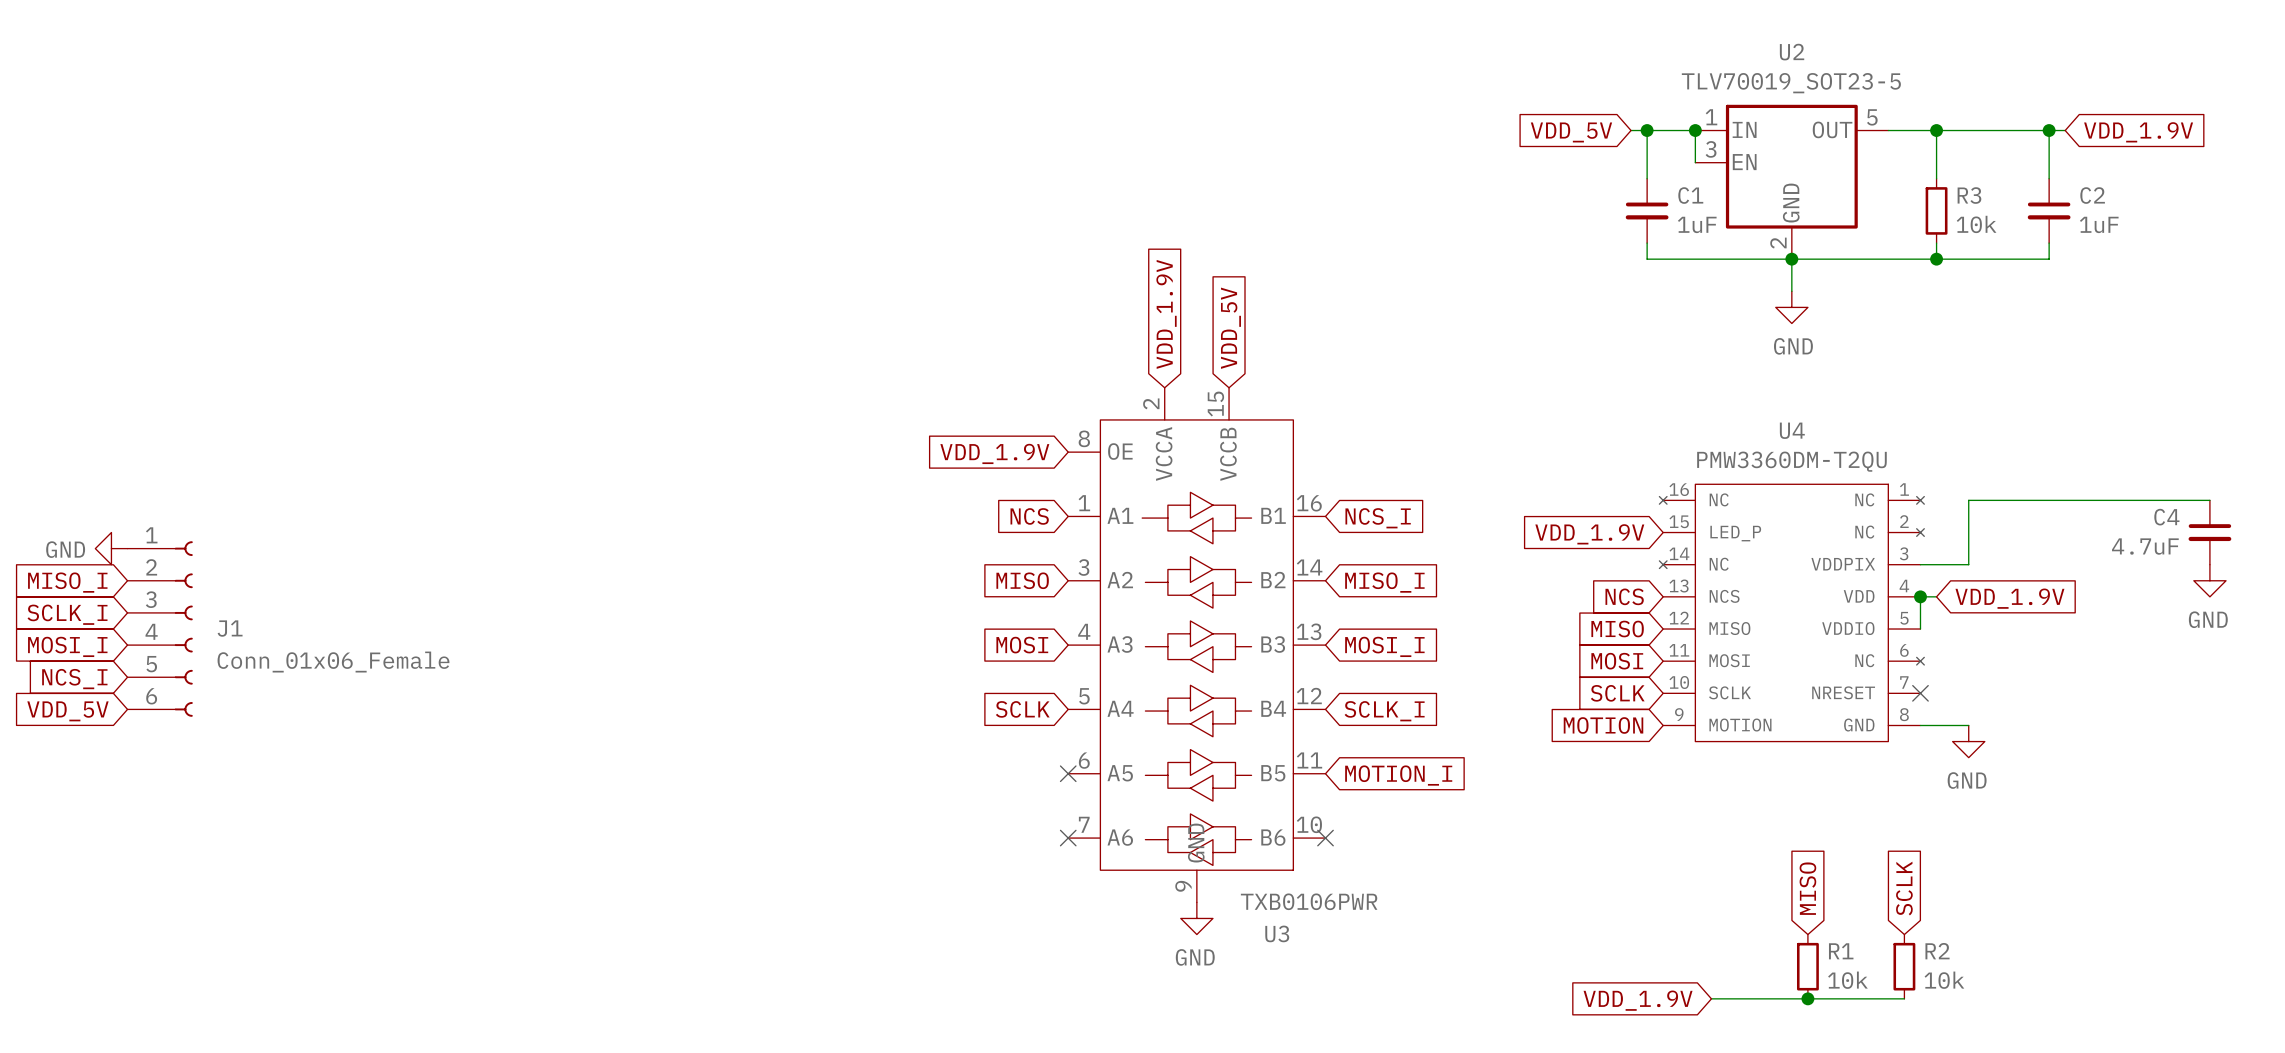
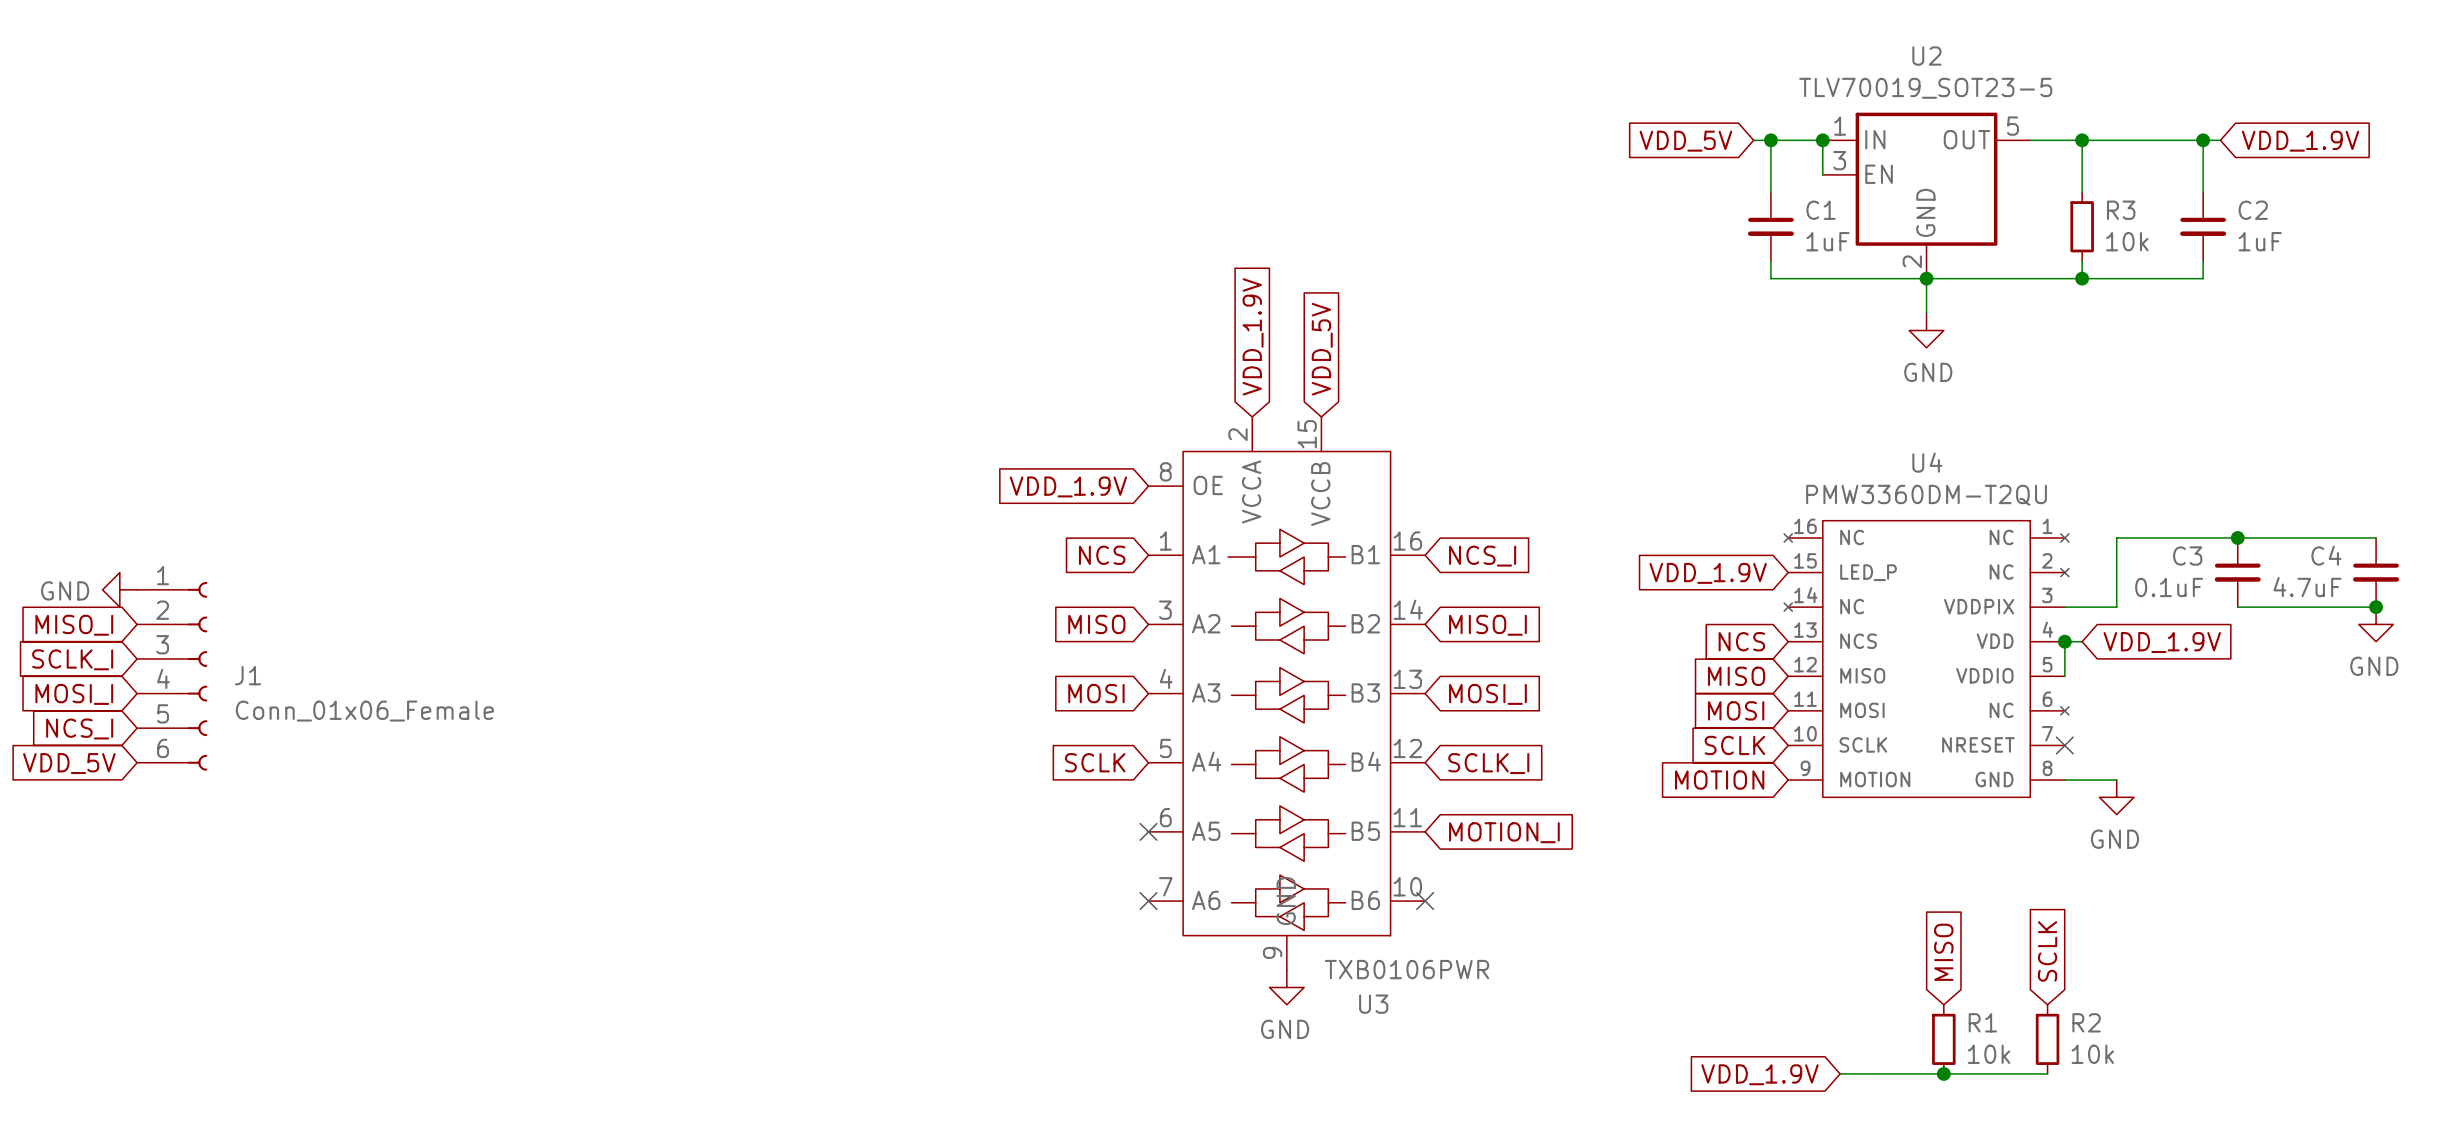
junction: none -> (2237, 537)
C3: none -> 0.1uF (2237, 572)
wire: none -> (2237, 607) (2376, 607)
junction: none -> (2376, 607)

